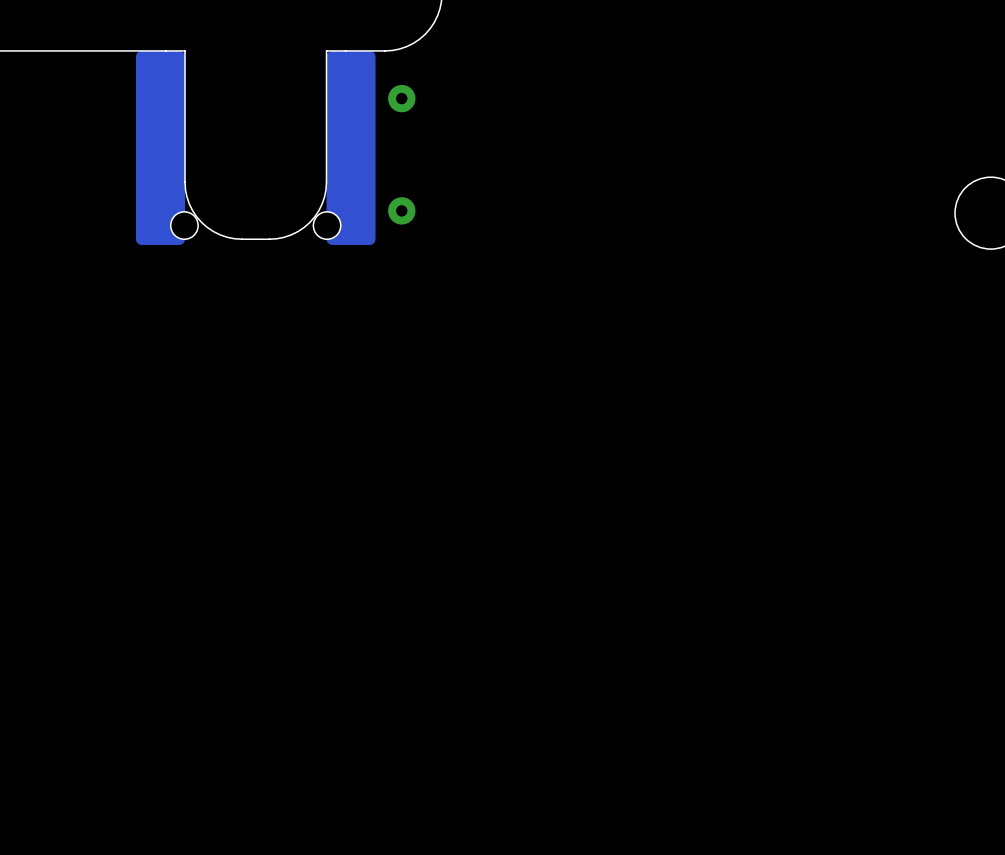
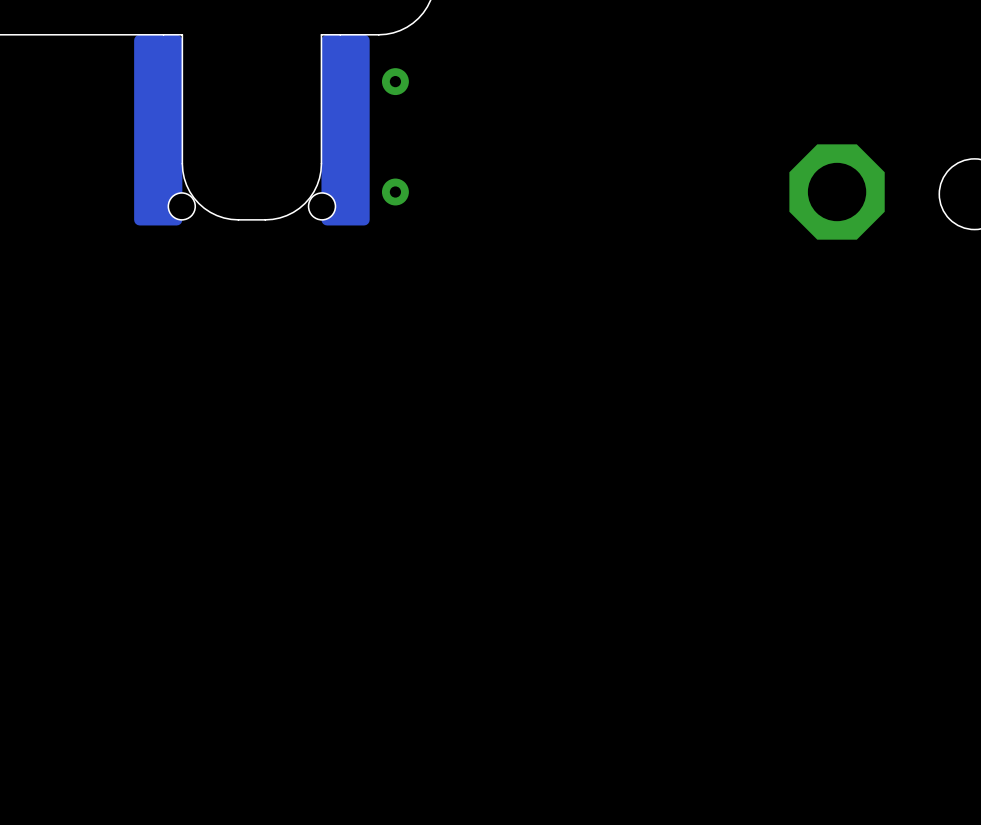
part: none -> (837, 192)

